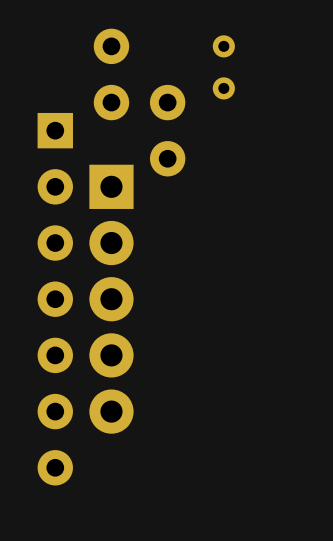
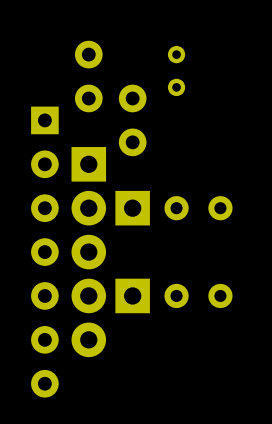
part: none -> (132, 208)
part: none -> (198, 208)
part: none -> (132, 295)
part: none -> (198, 295)

